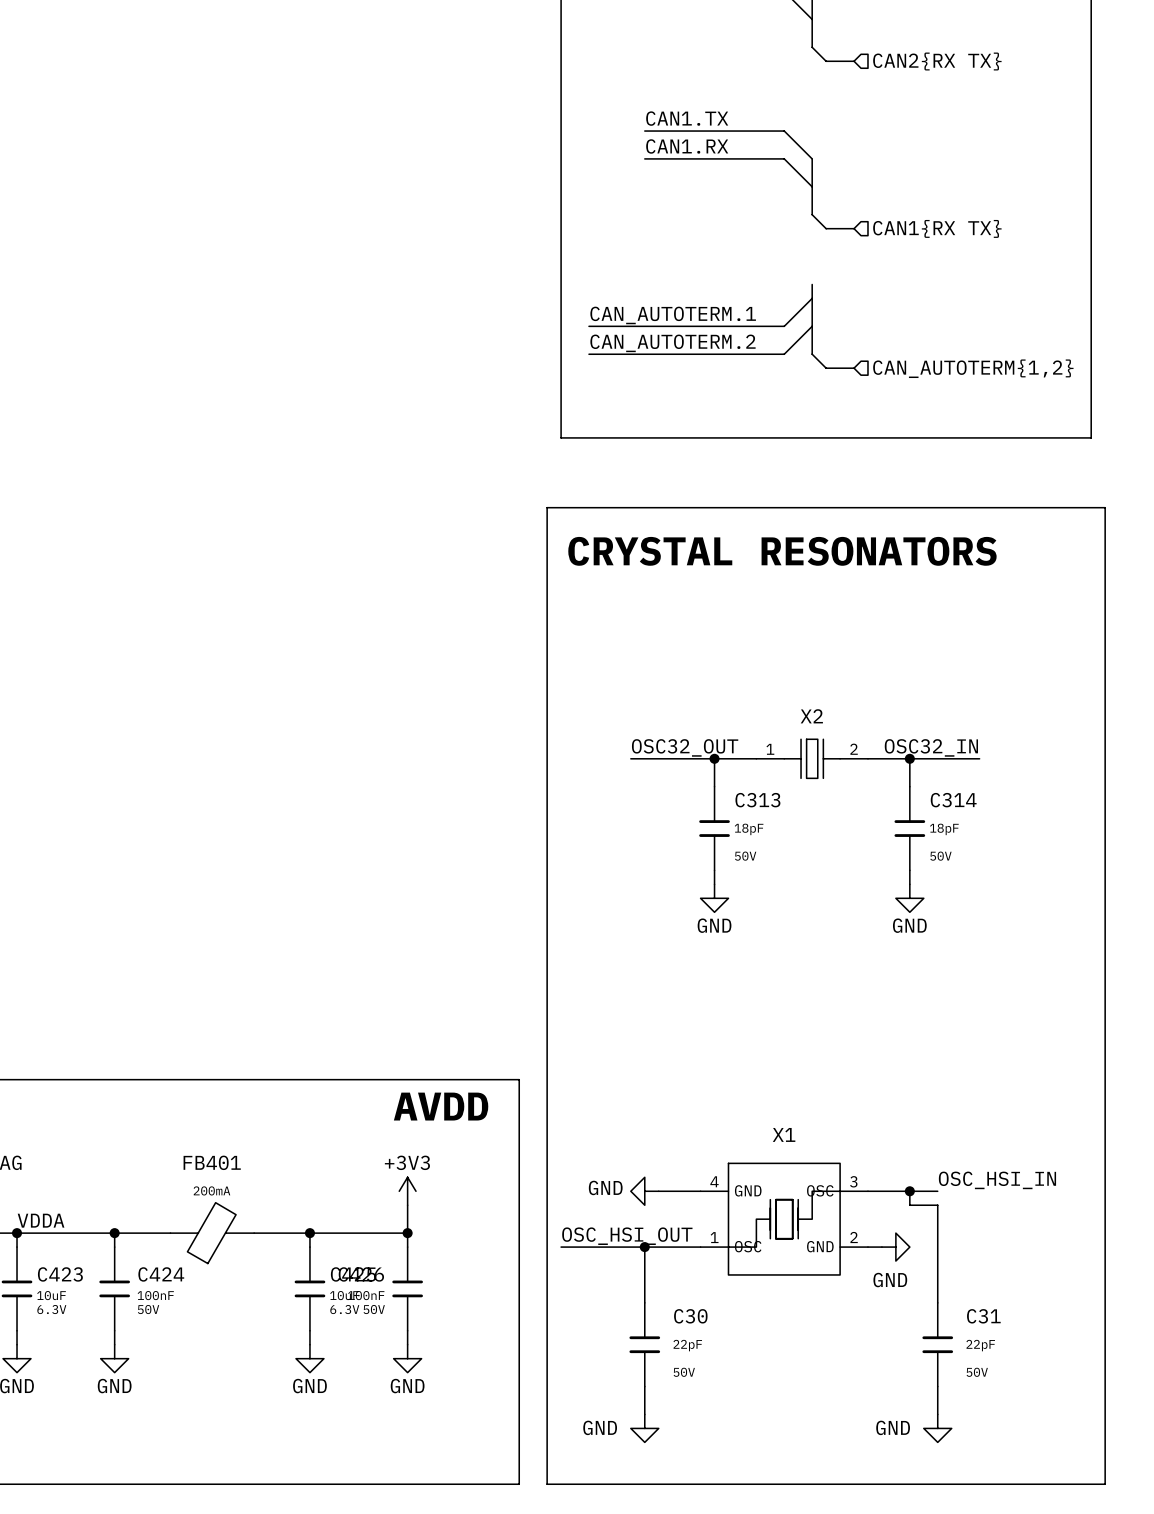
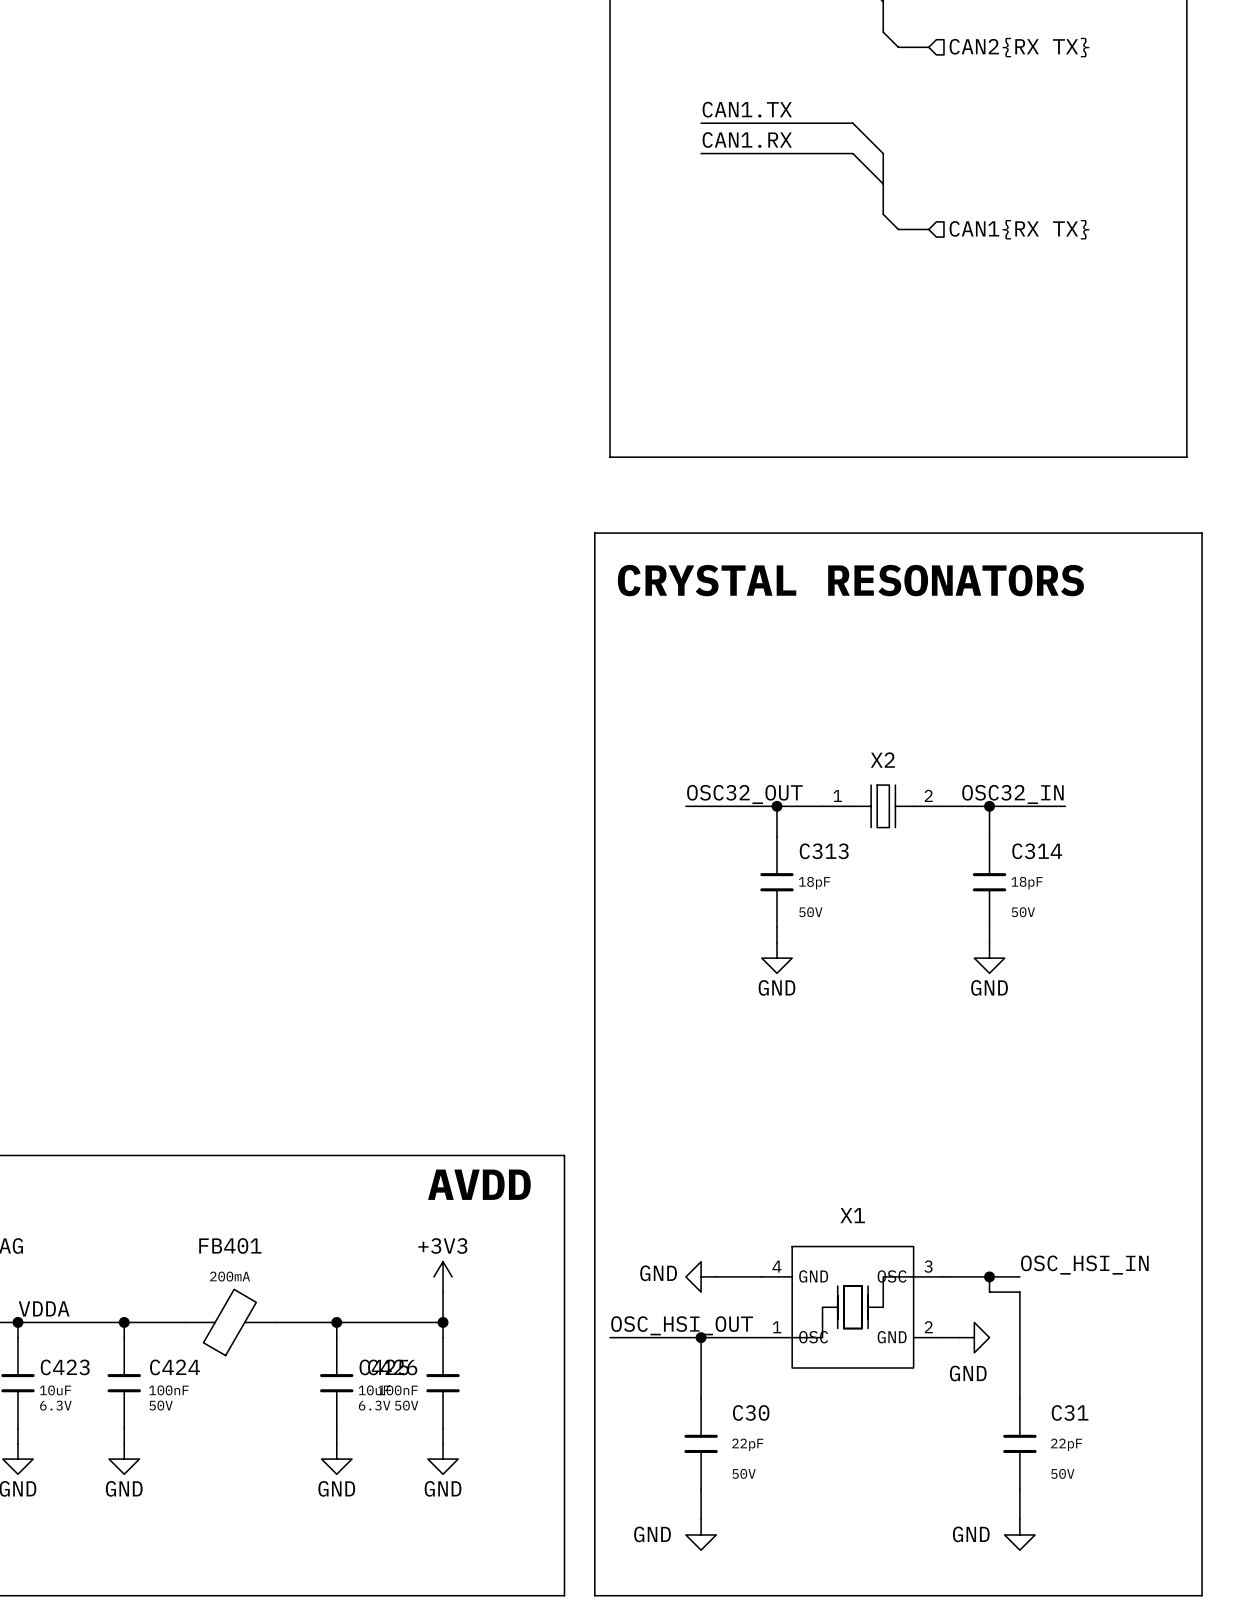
bus: (812, 284) (812, 354) (826, 368) (854, 368) -> none
wire: (812, 298) (784, 326) (588, 326) -> none
label: CAN_AUTOTERM.1 (673, 315) -> none
wire: (812, 326) (784, 354) (588, 354) -> none
label: CAN_AUTOTERM.2 (672, 343) -> none
hierarchical label: CAN_AUTOTERM{1,2} (973, 368) -> none

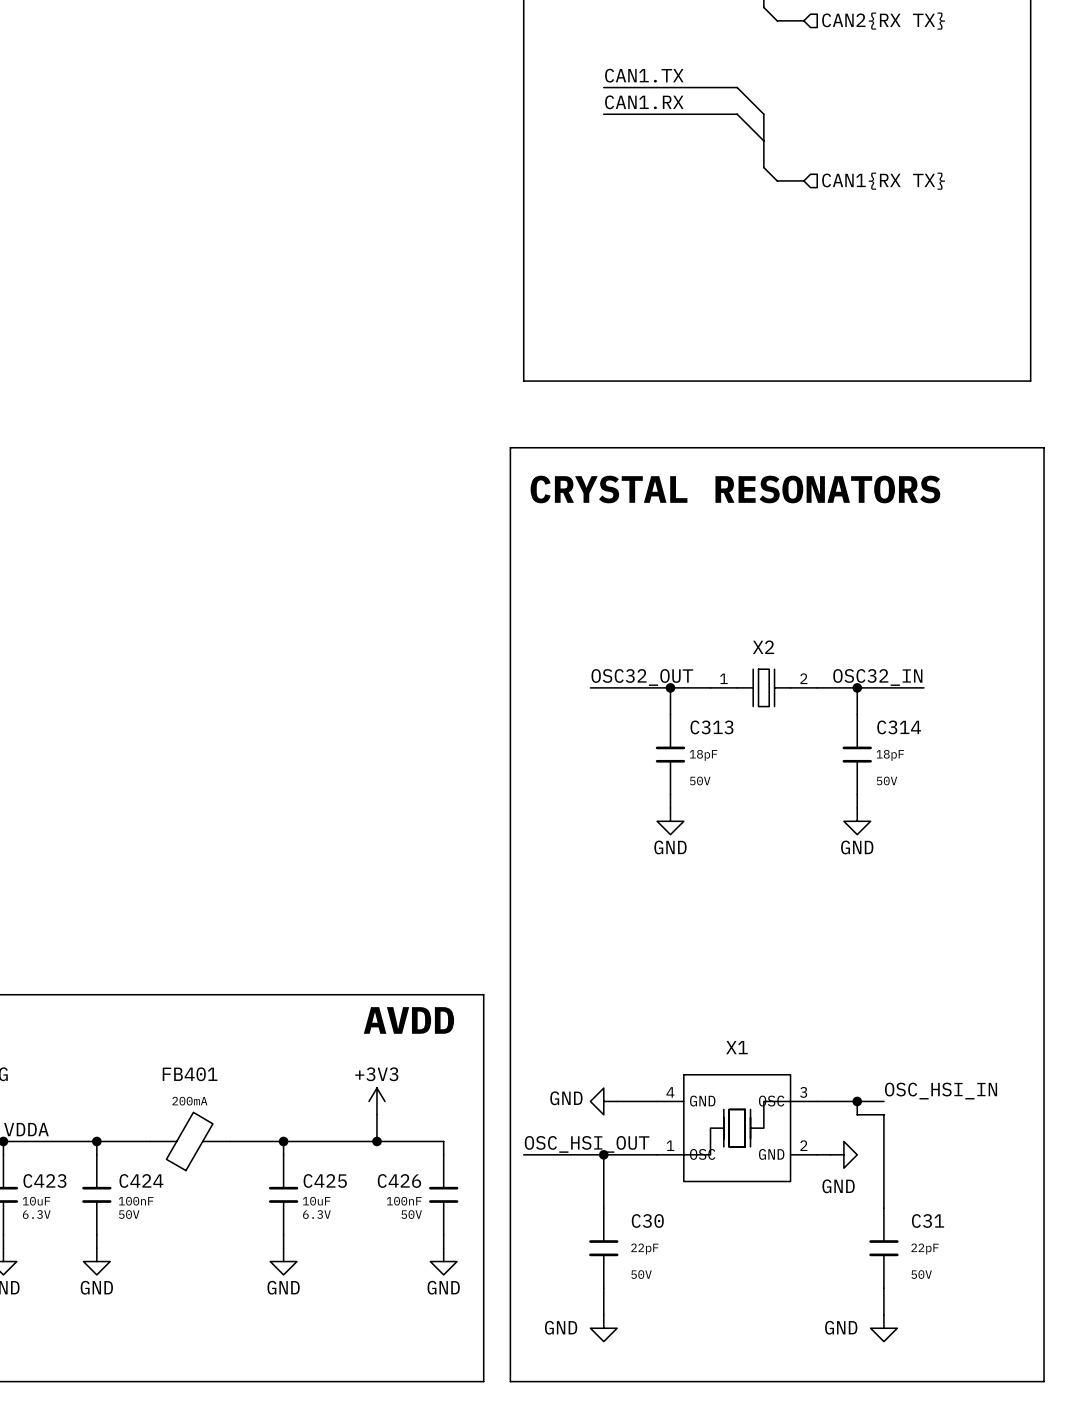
wire: (443, 1322) (443, 1337) -> (376, 1141) (443, 1141) (443, 1154)
C426 position: (443, 1383) -> (443, 1194)
wire: (443, 1428) (443, 1443) -> (443, 1234) (443, 1248)
power symbol position: GND (443, 1459) -> GND (443, 1261)

